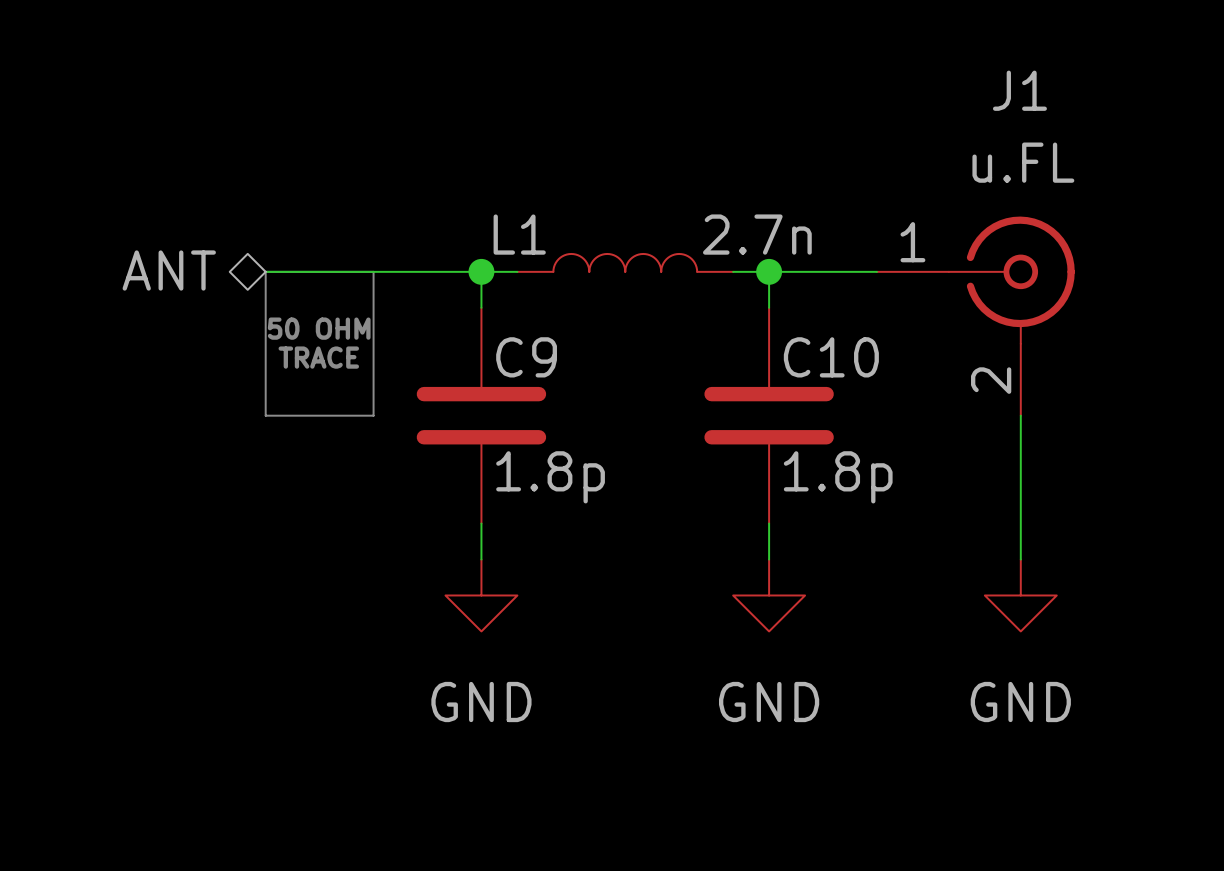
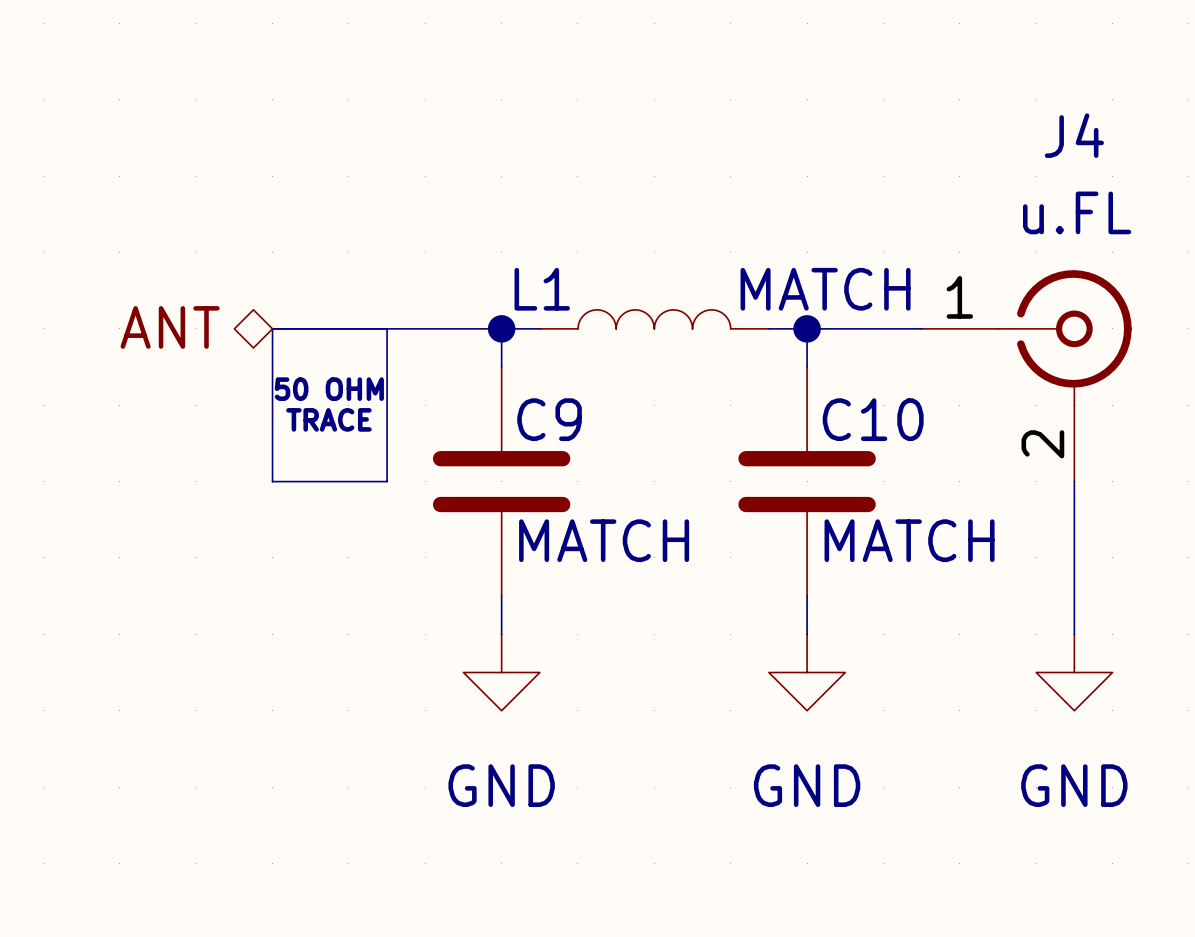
J1 name: J1 (1019, 90) -> J4 (1074, 135)
L1 value: 2.7n (757, 234) -> MATCH (825, 289)
C9 value: 1.8p (550, 477) -> MATCH (604, 540)
C10 value: 1.8p (838, 477) -> MATCH (909, 540)

